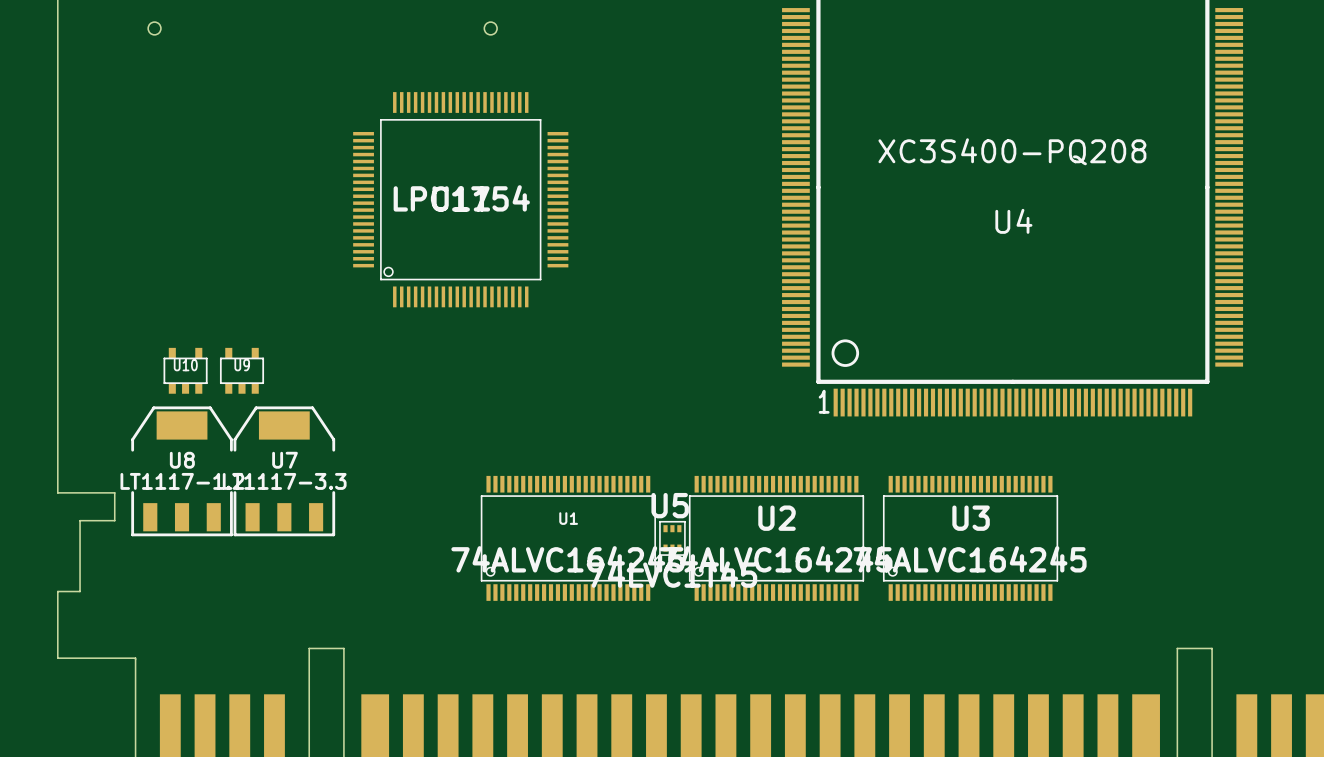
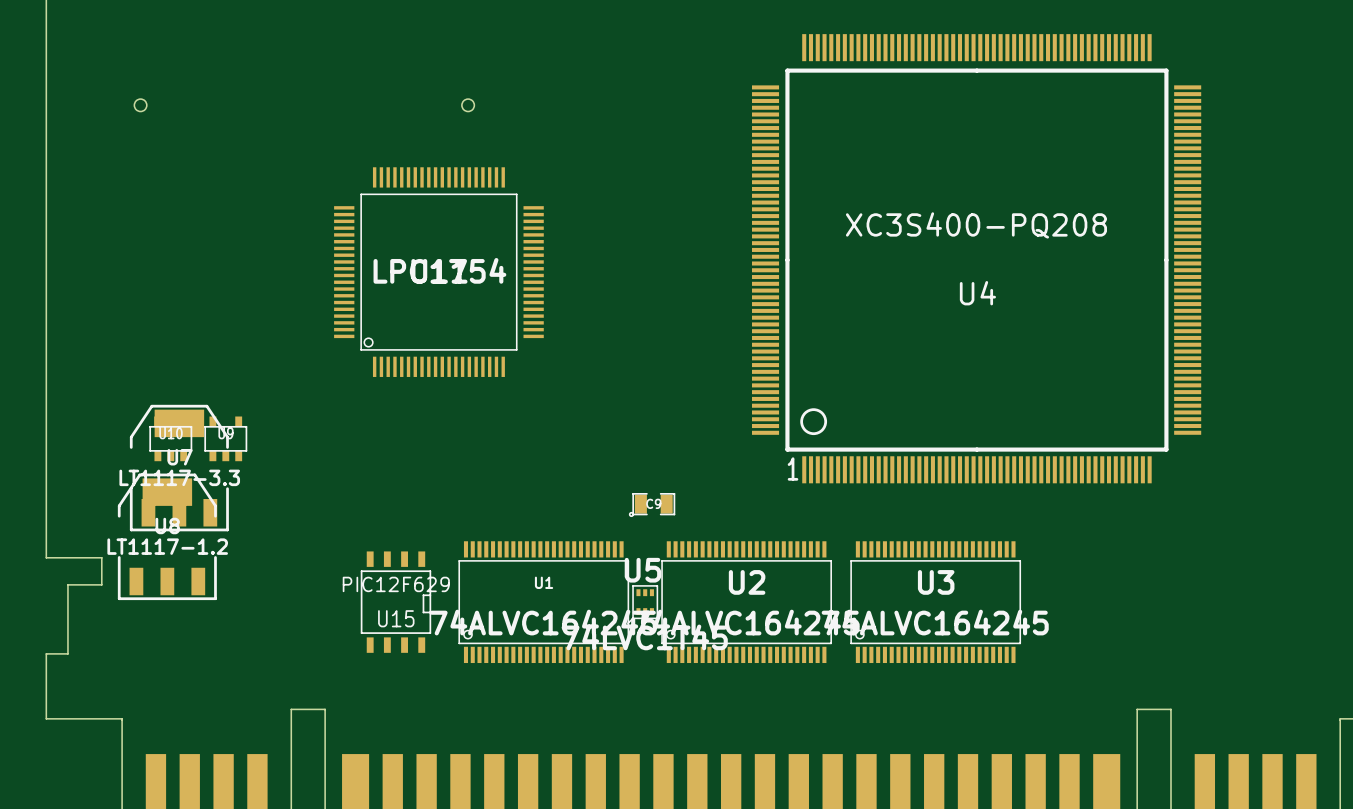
C9: none -> (652, 505)
U7 position: (284, 471) -> (179, 468)
U15: none -> PIC12F629 (395, 602)

